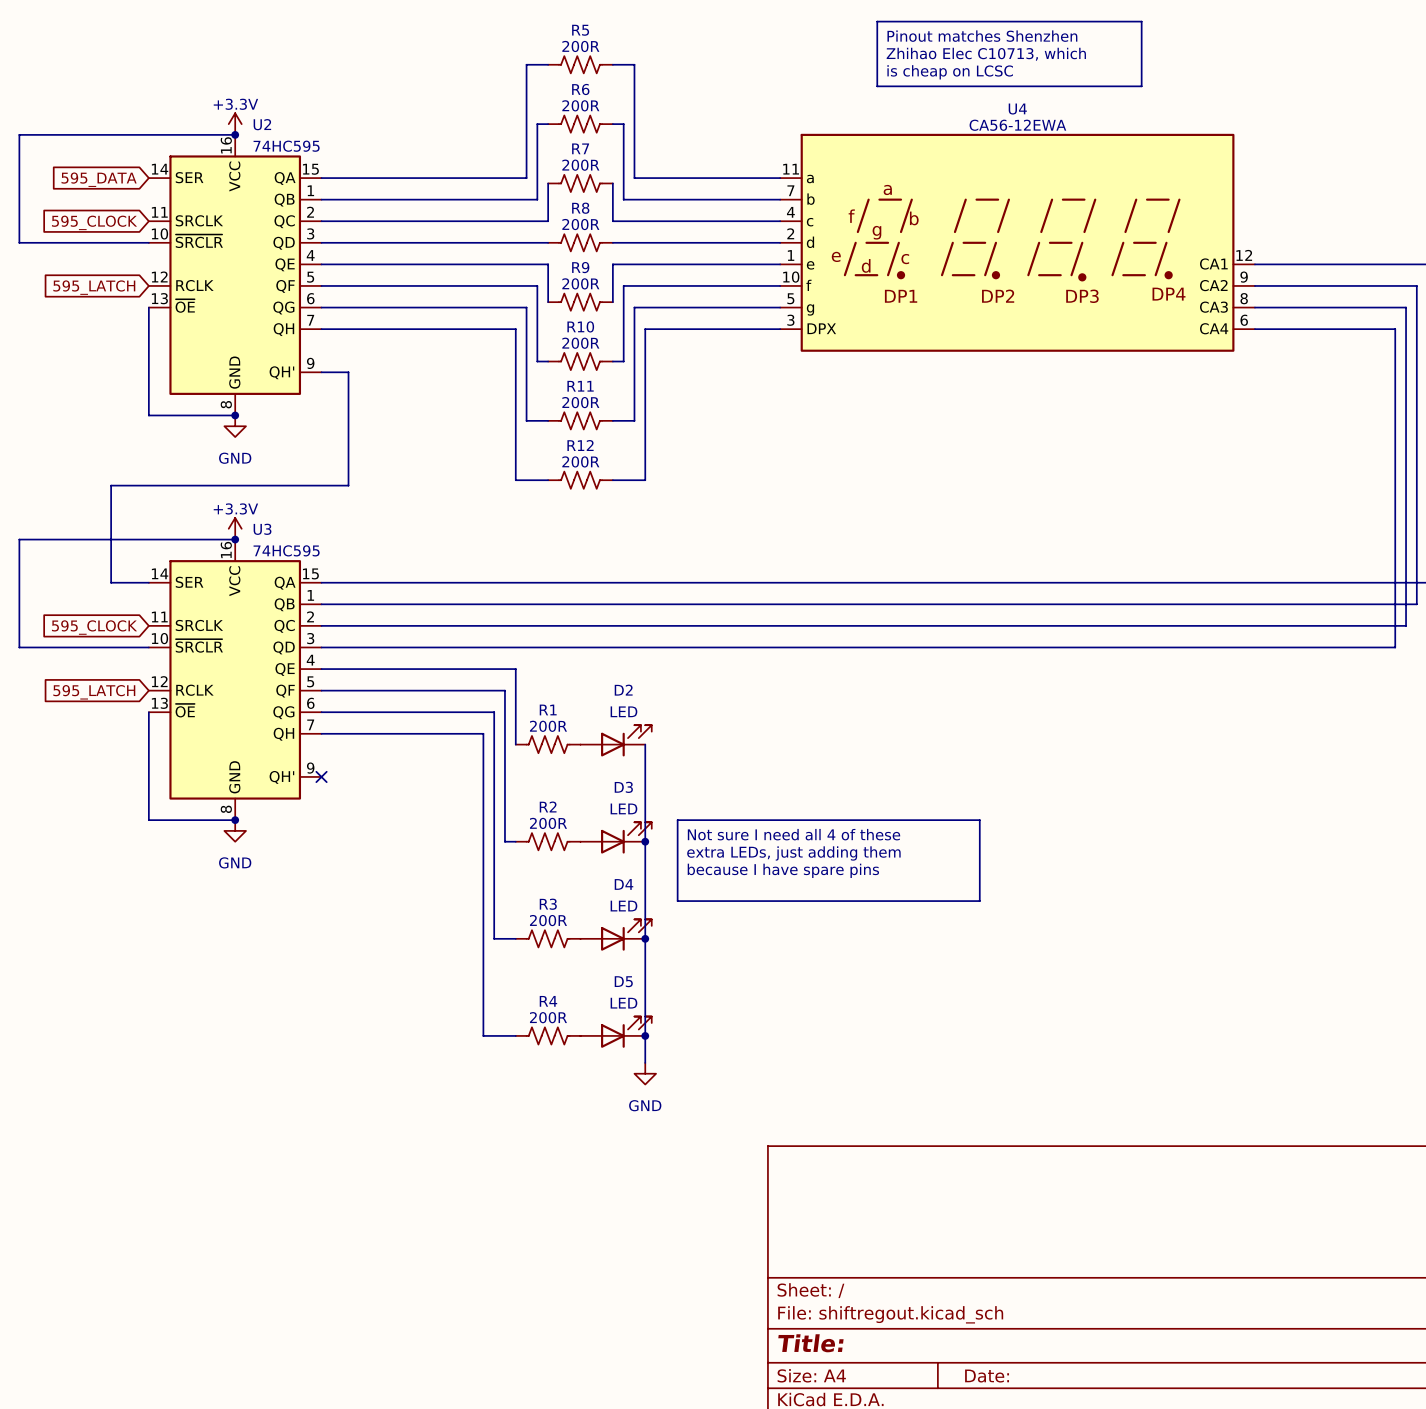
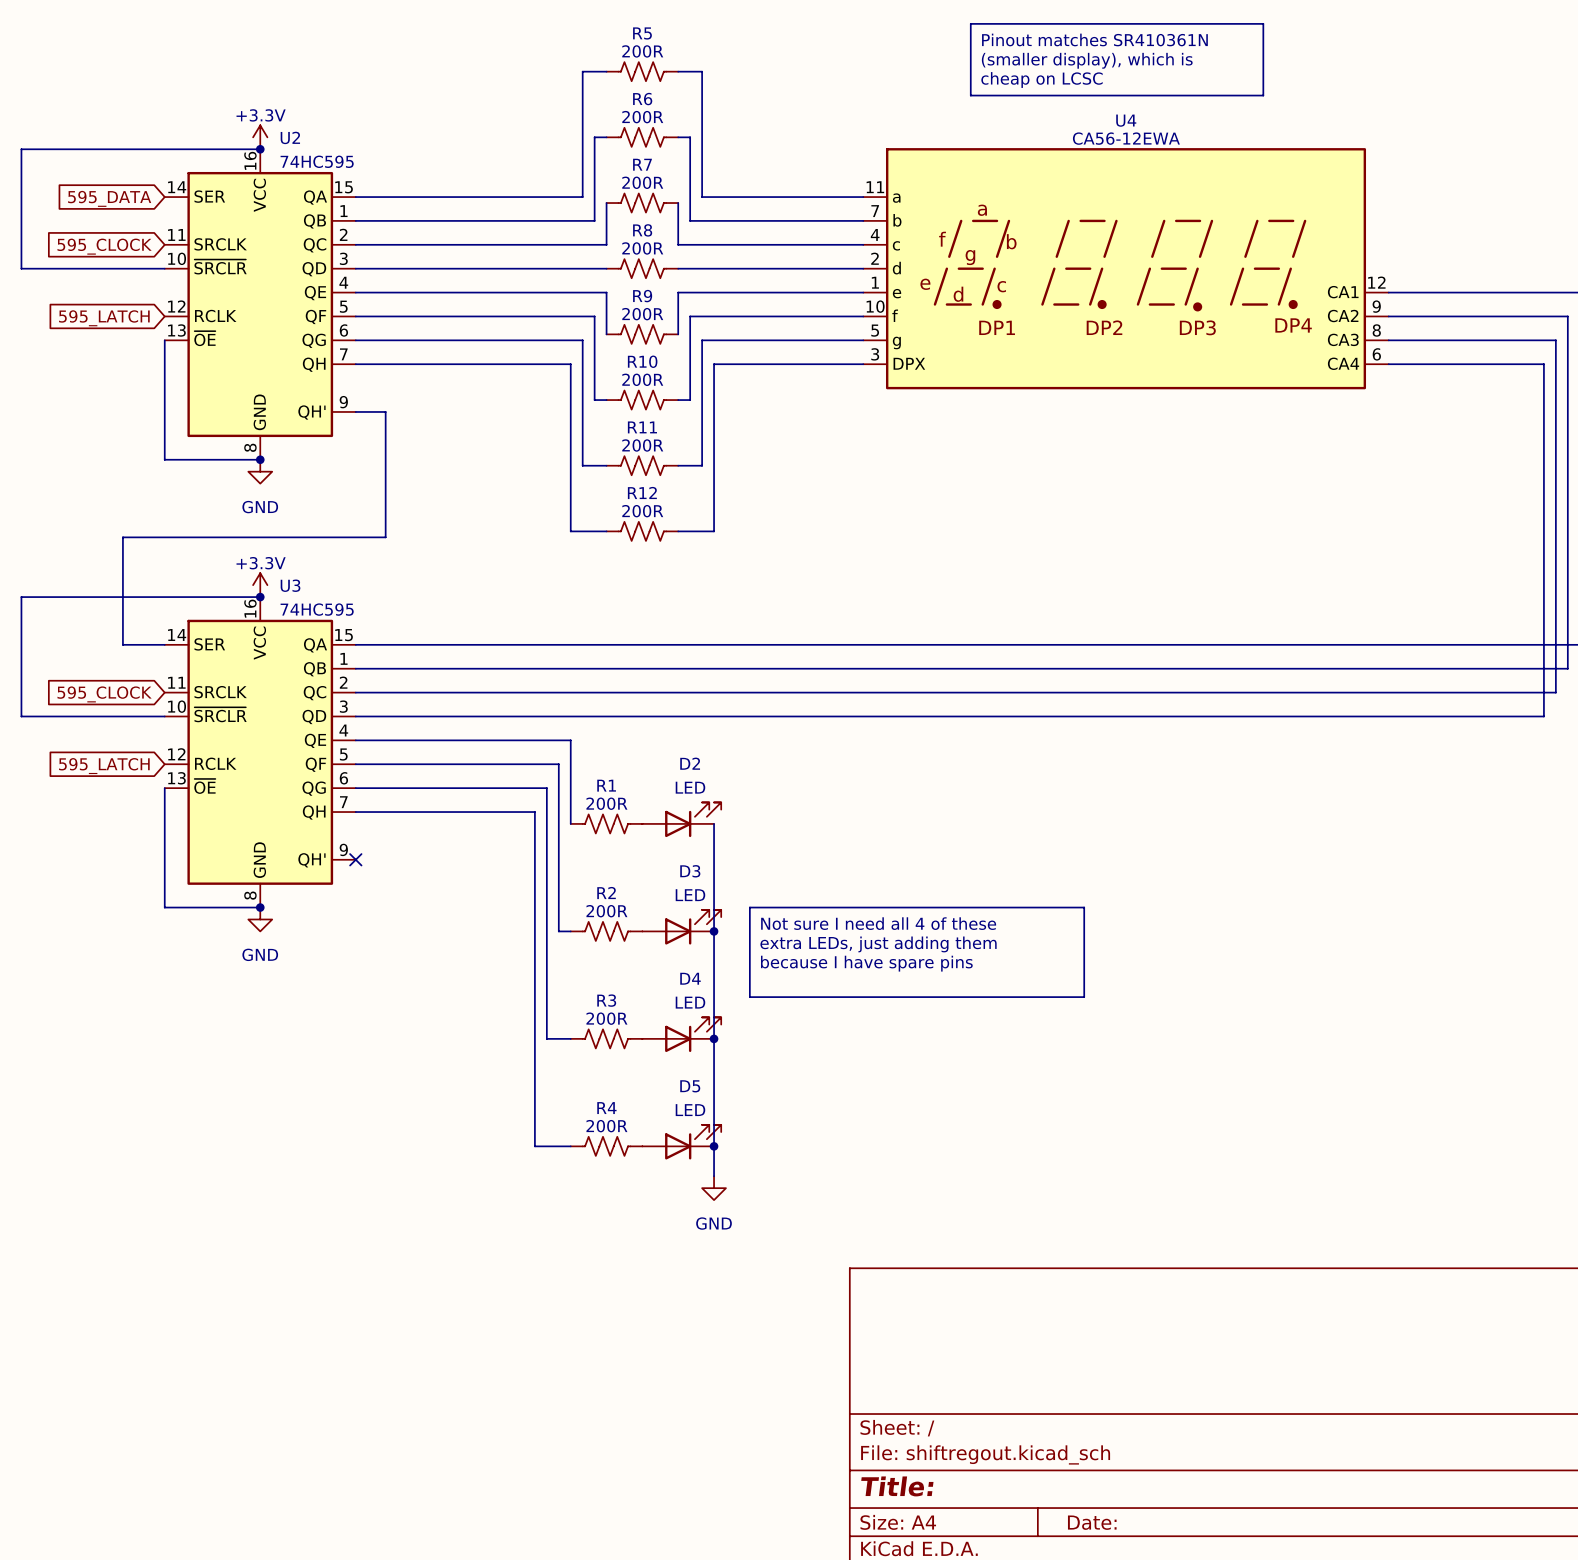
text: Pinout matches Shenzhen (982, 36) -> Pinout matches SR410361N (1094, 39)
text: Zhihao Elec C10713, which (986, 54) -> (smaller display), which is (1087, 60)
text: is cheap on LCSC (950, 72) -> cheap on LCSC (1042, 80)

